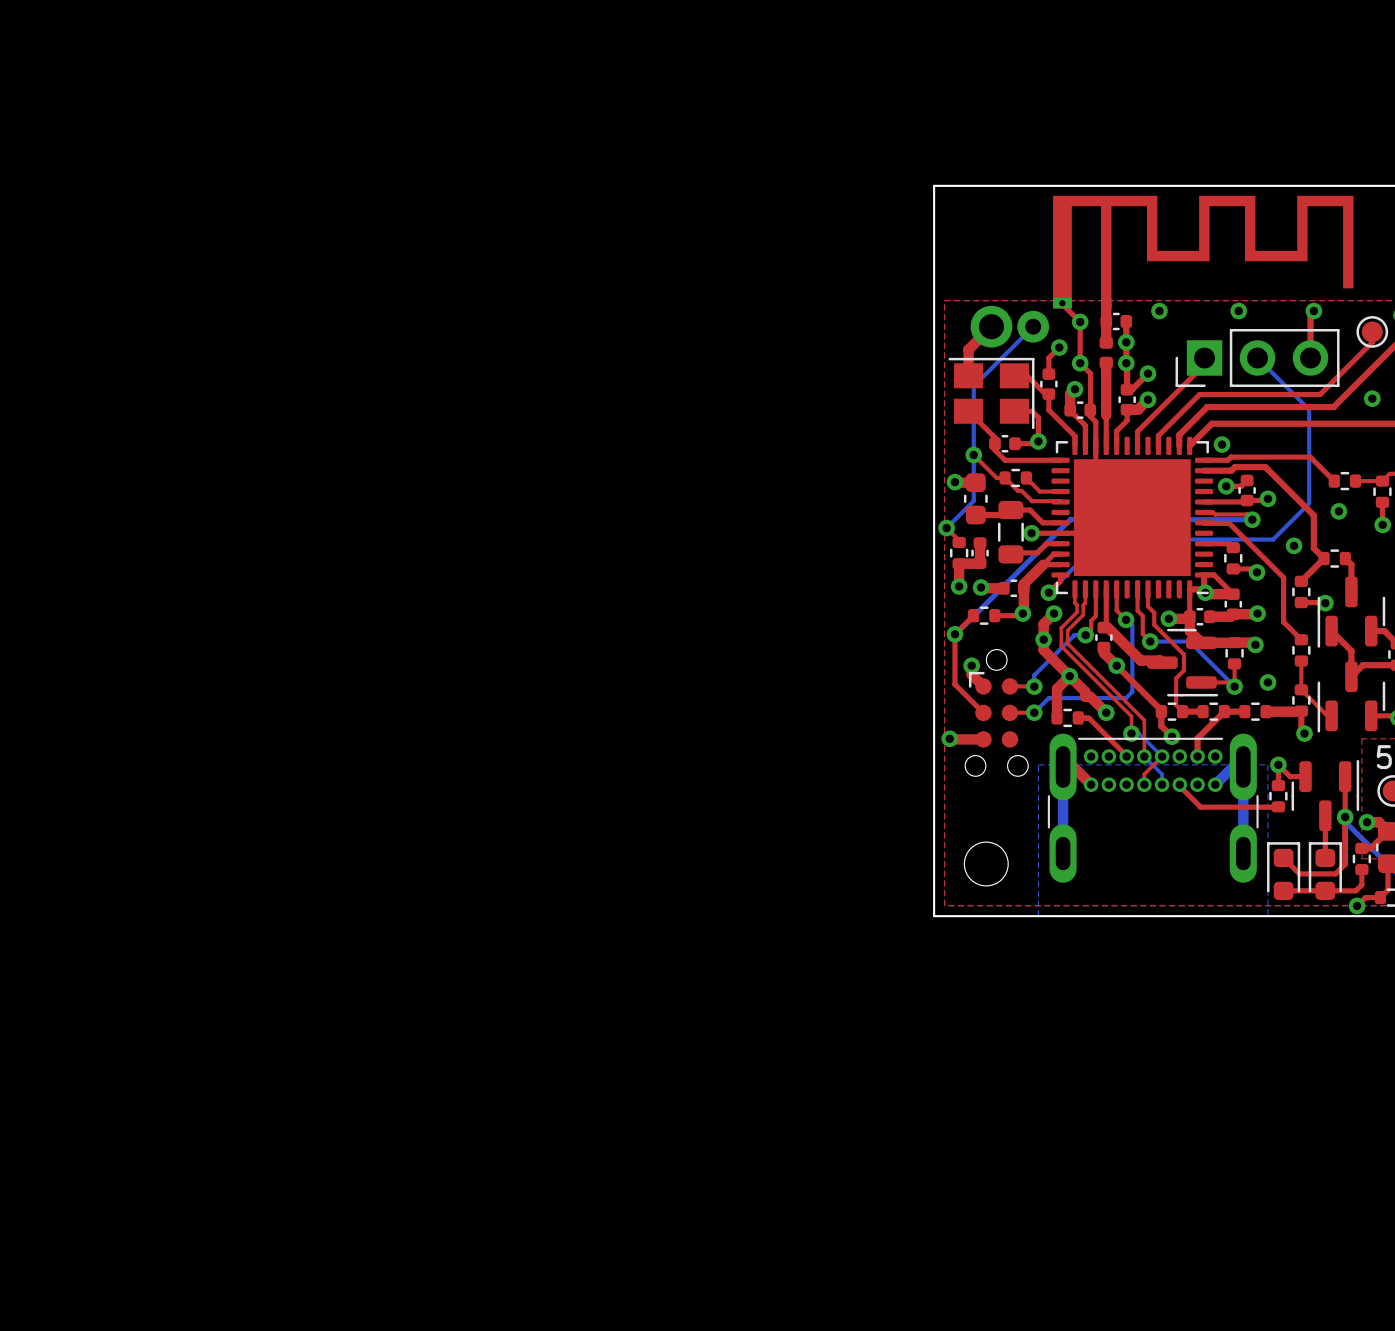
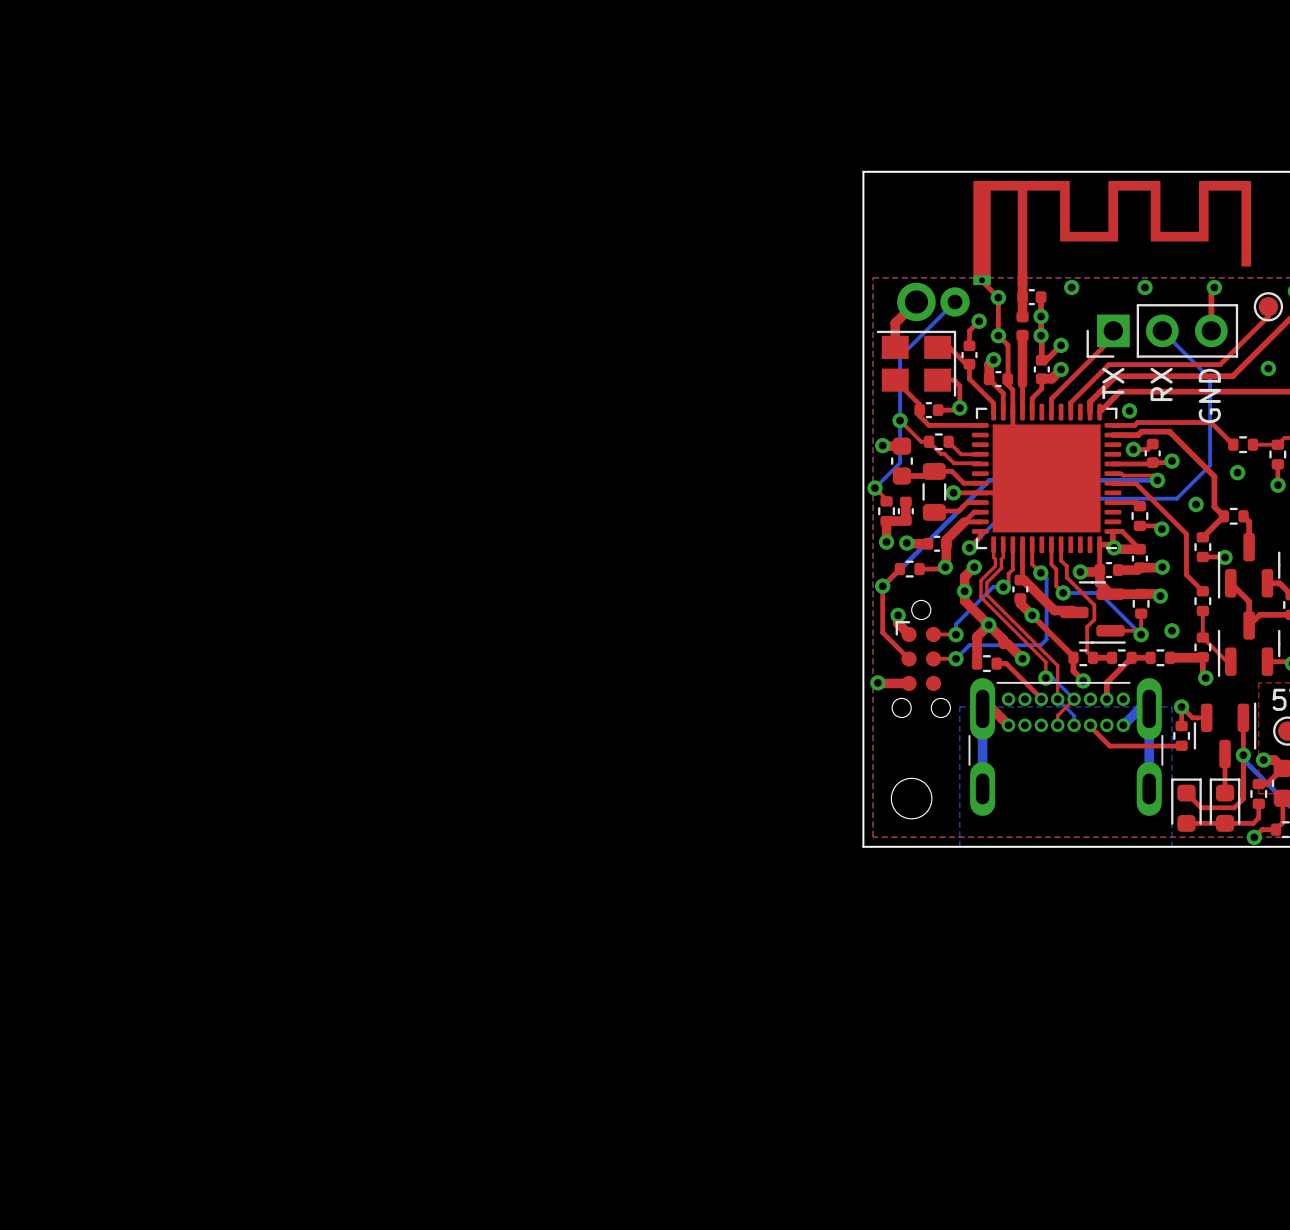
text: none -> TX (1113, 383)
text: none -> RX (1161, 384)
text: none -> GND (1209, 395)

